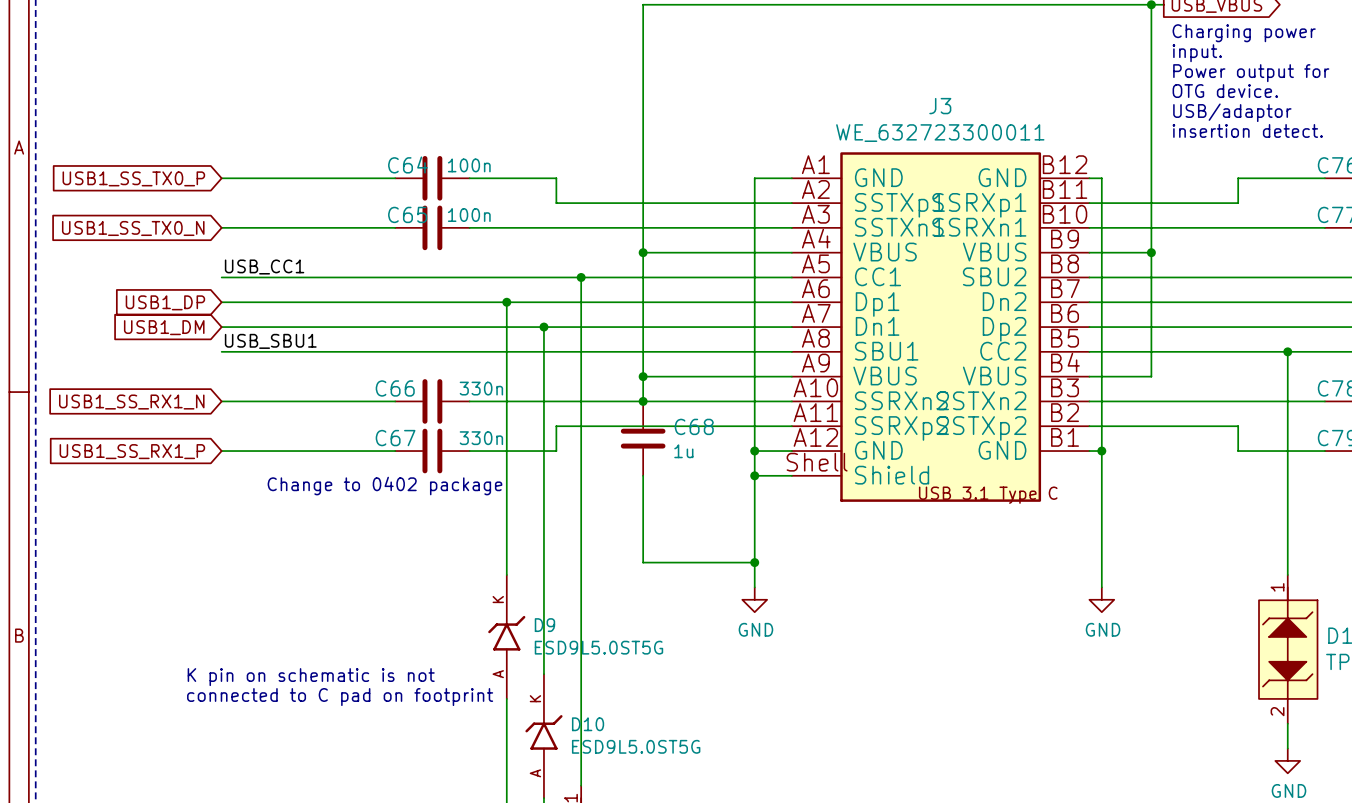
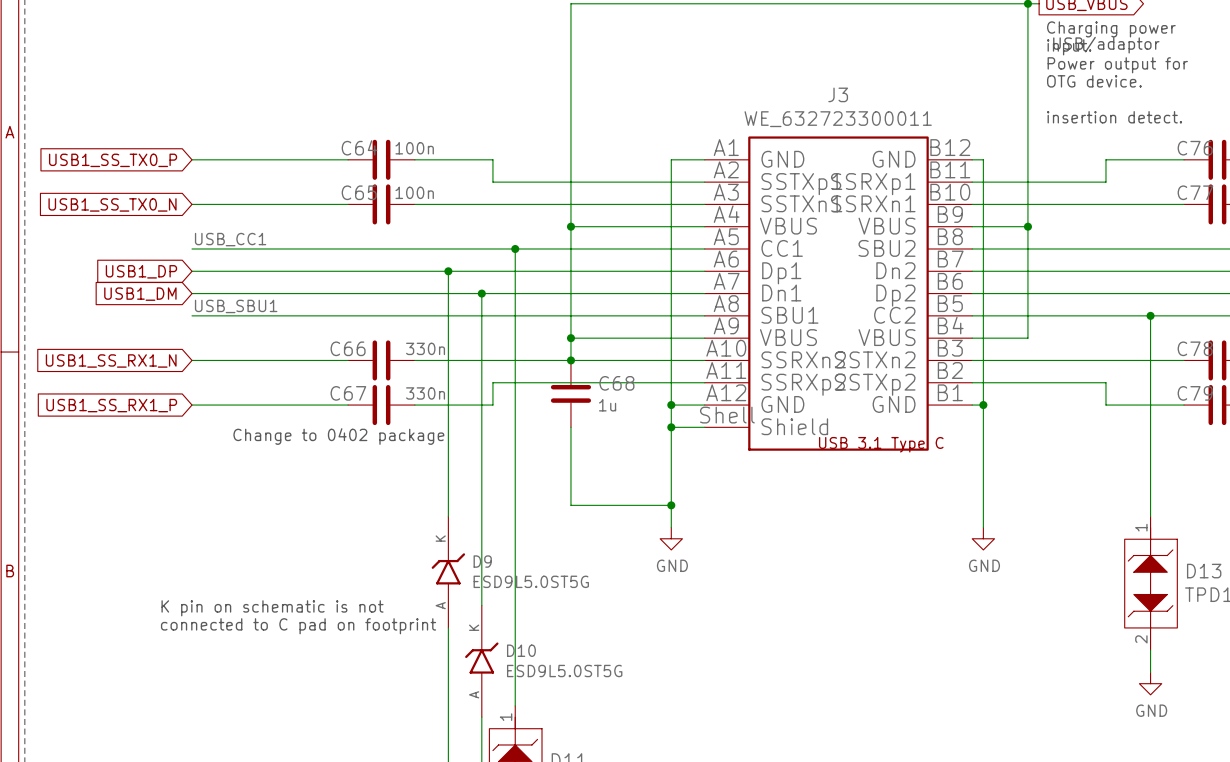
text position: USB/adaptor (1232, 112) -> USB/adaptor (1106, 45)

